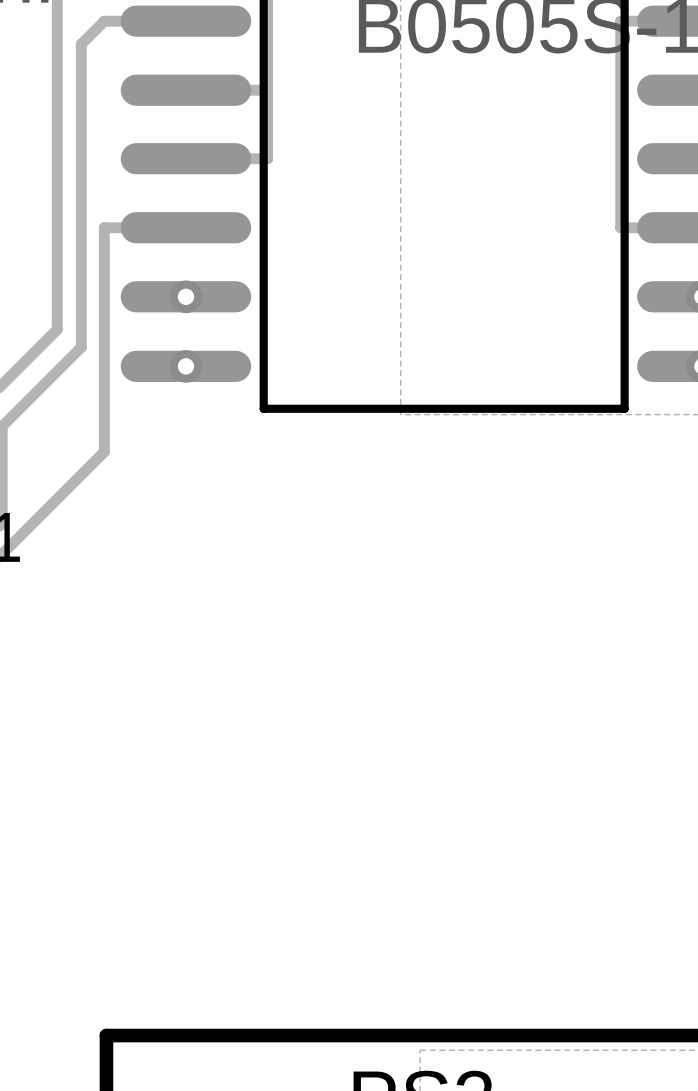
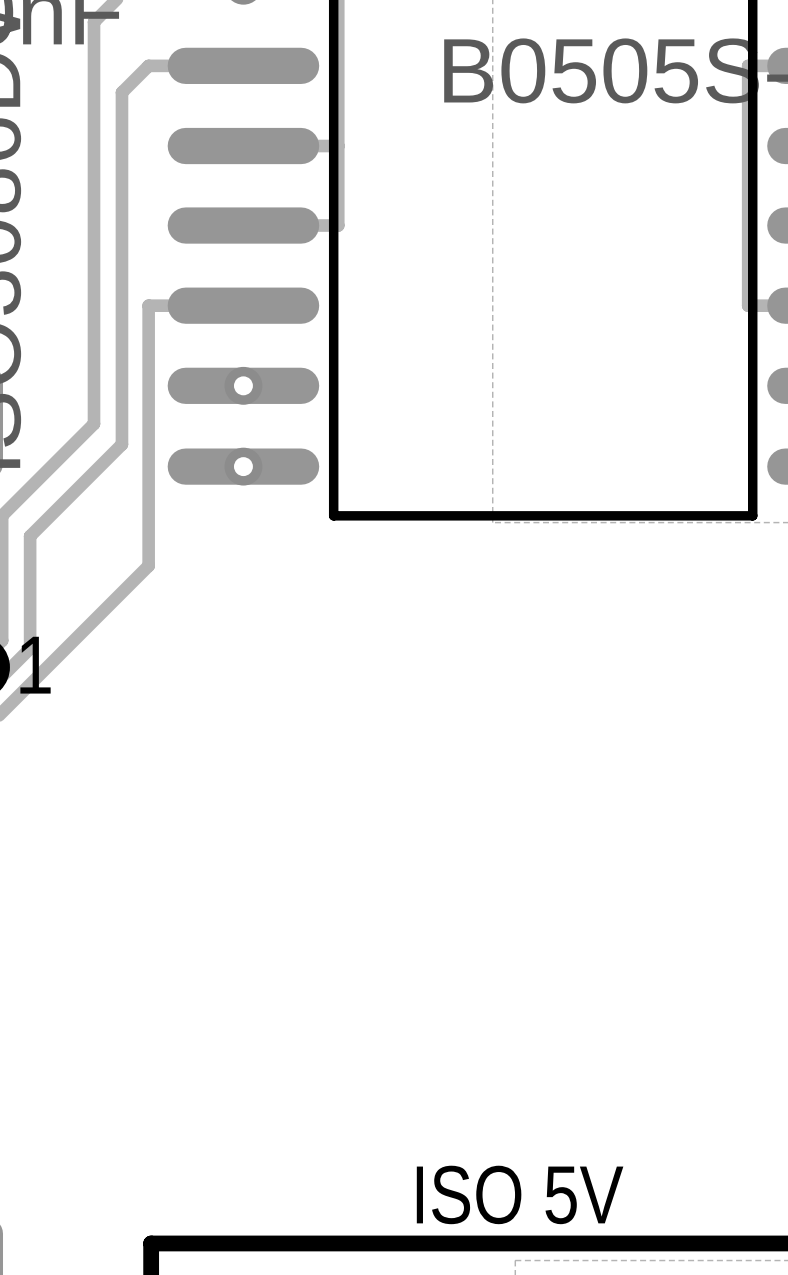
text: none -> ISO 5V (520, 1194)

